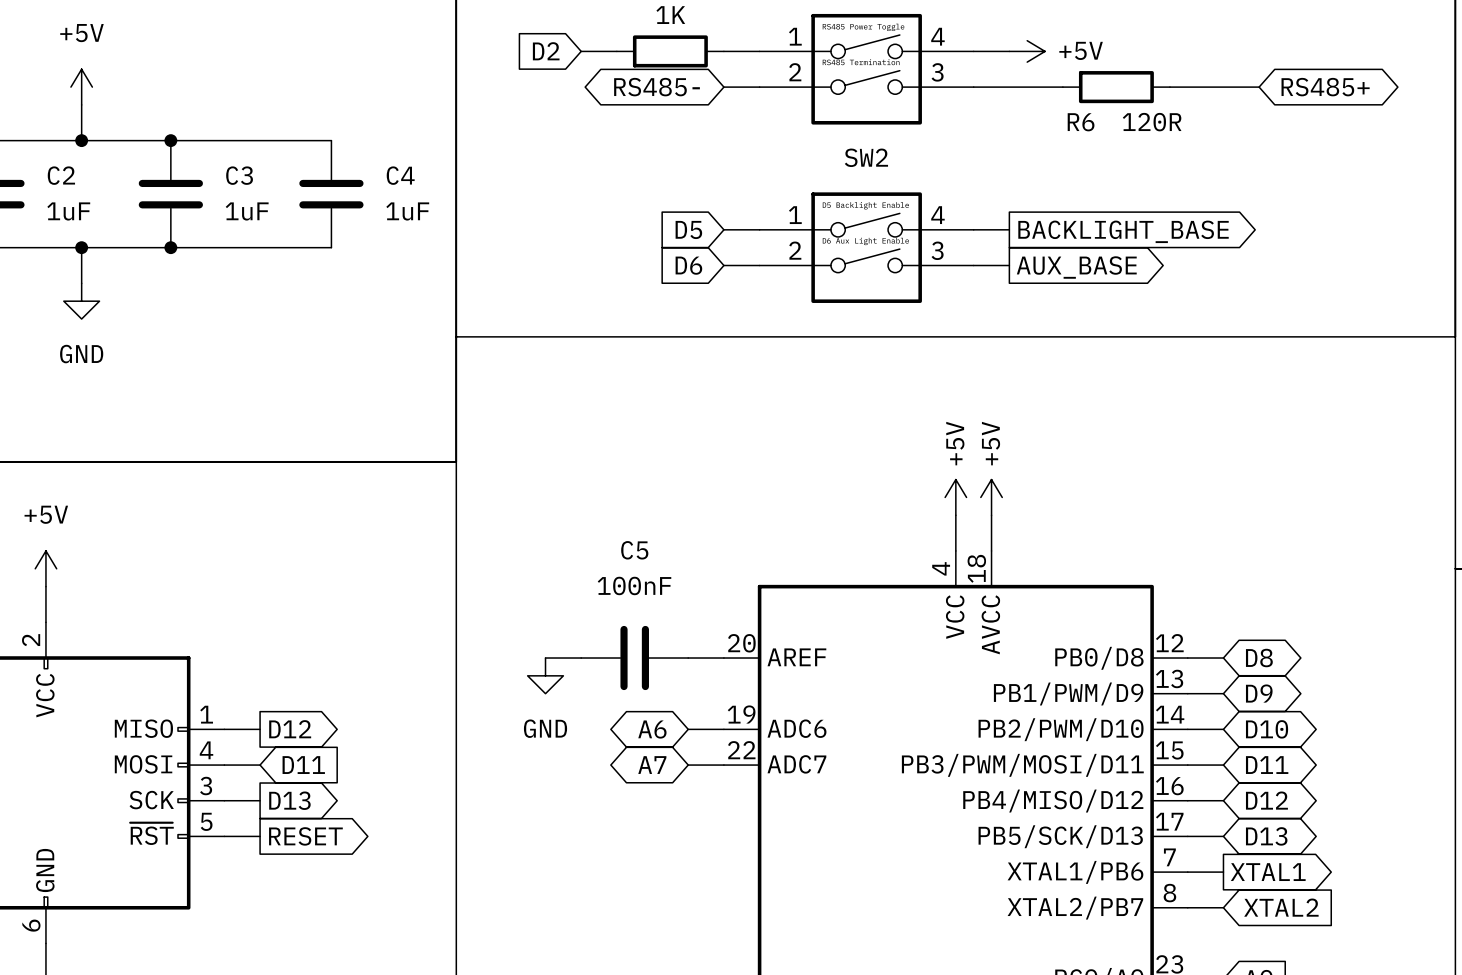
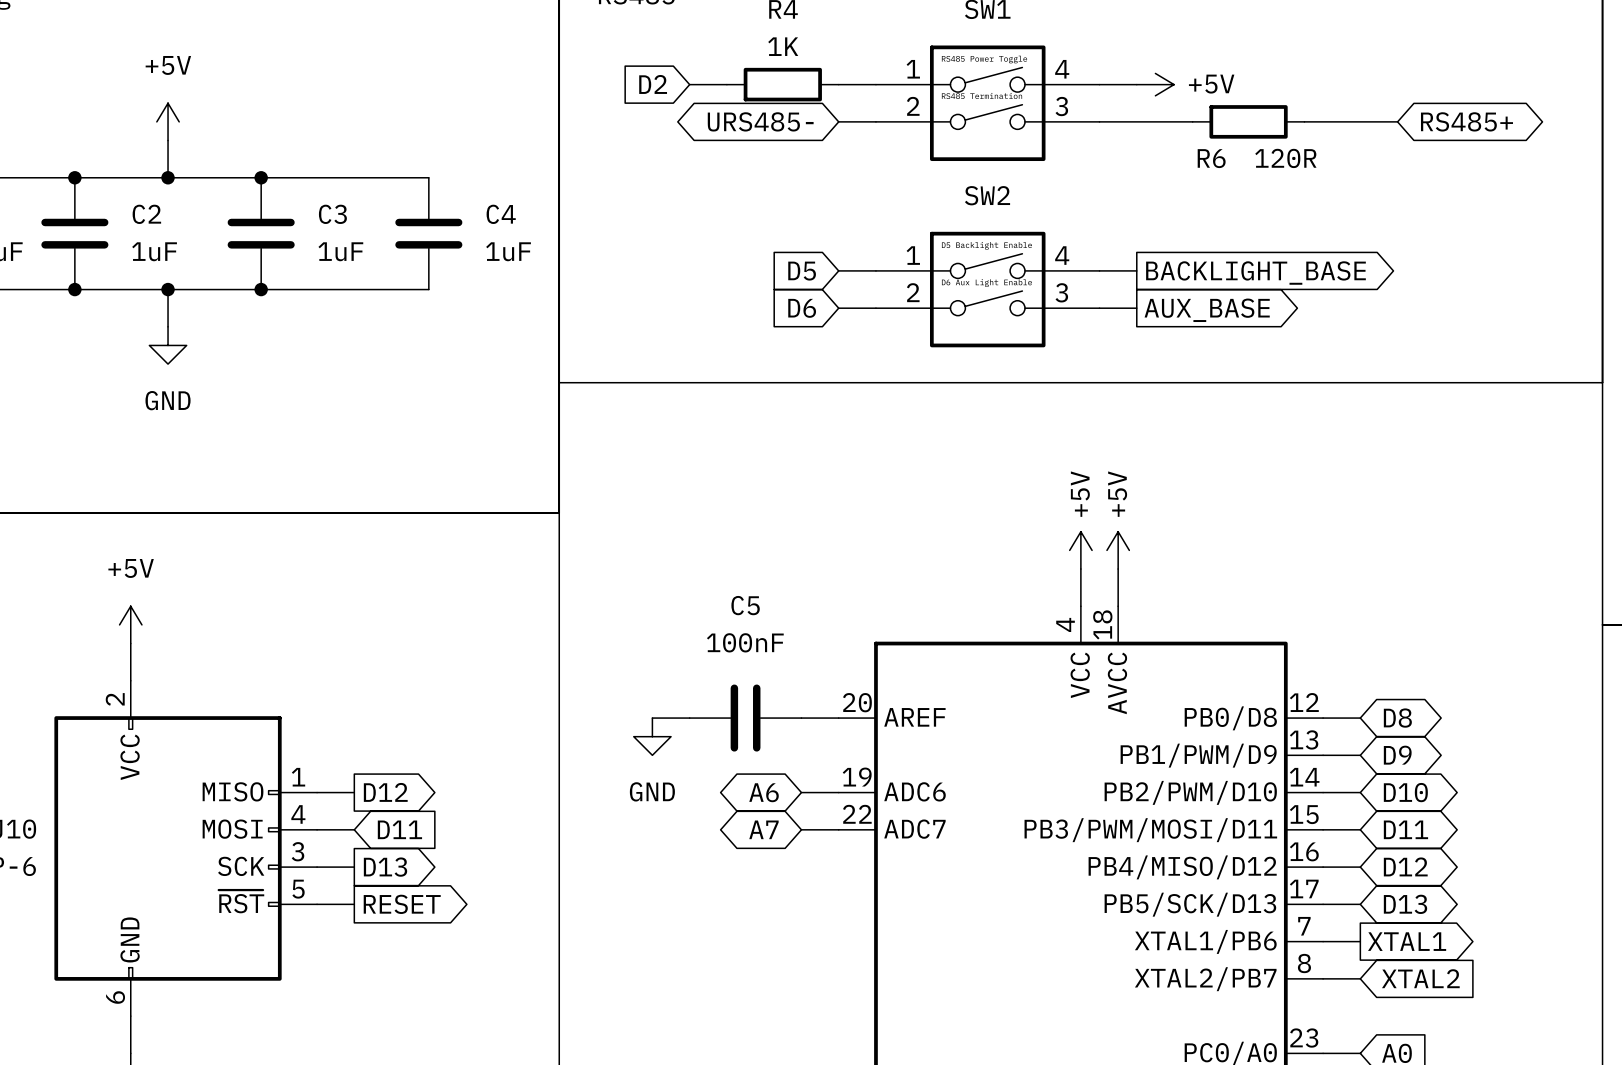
global label: RS485- (657, 87) -> URS485- (760, 121)

